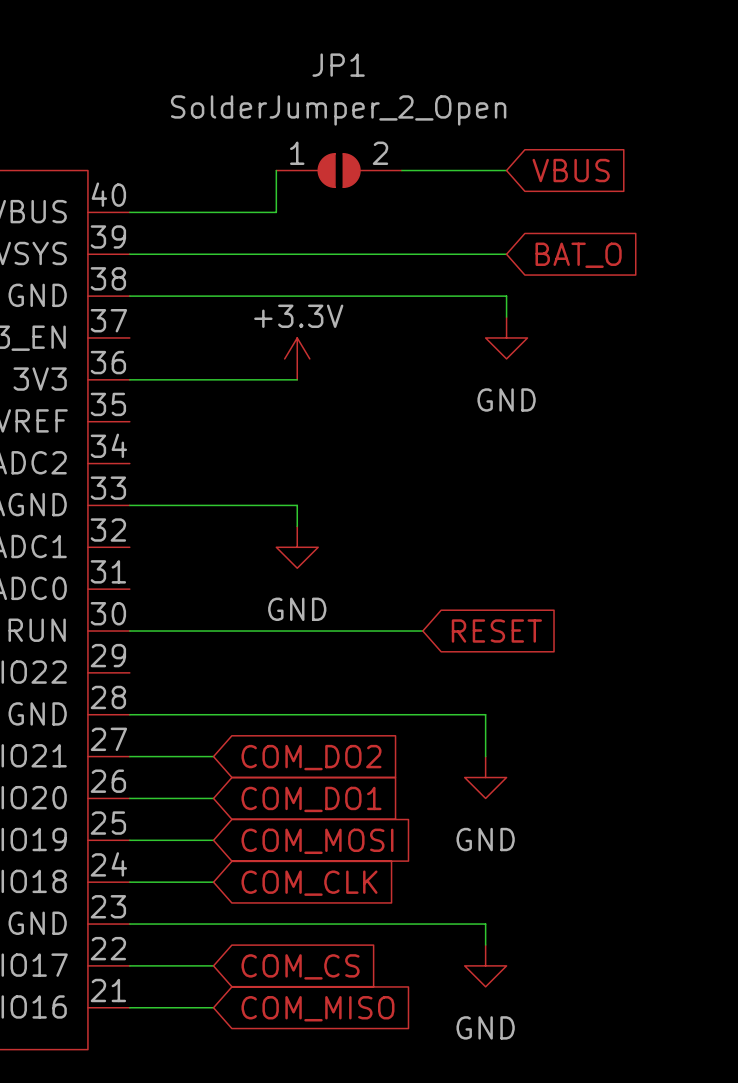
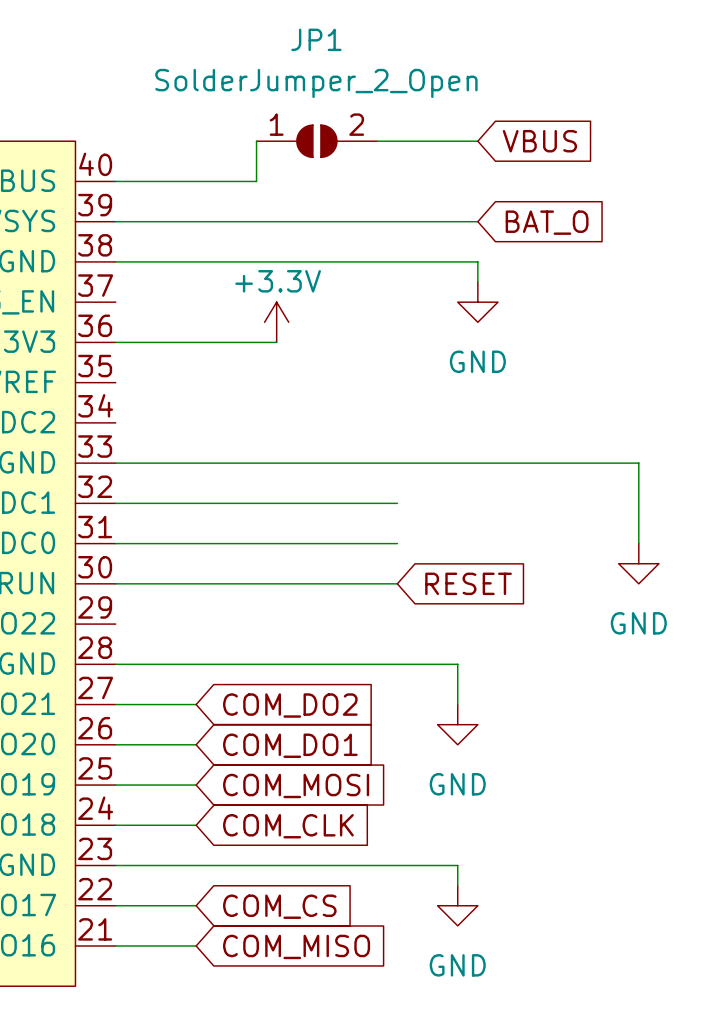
wire: (297, 505) (297, 526) -> (276, 463) (638, 463) (638, 543)
wire: none -> (115, 503) (397, 503)
power symbol position: GND (297, 547) -> GND (638, 563)
wire: none -> (115, 543) (397, 543)

